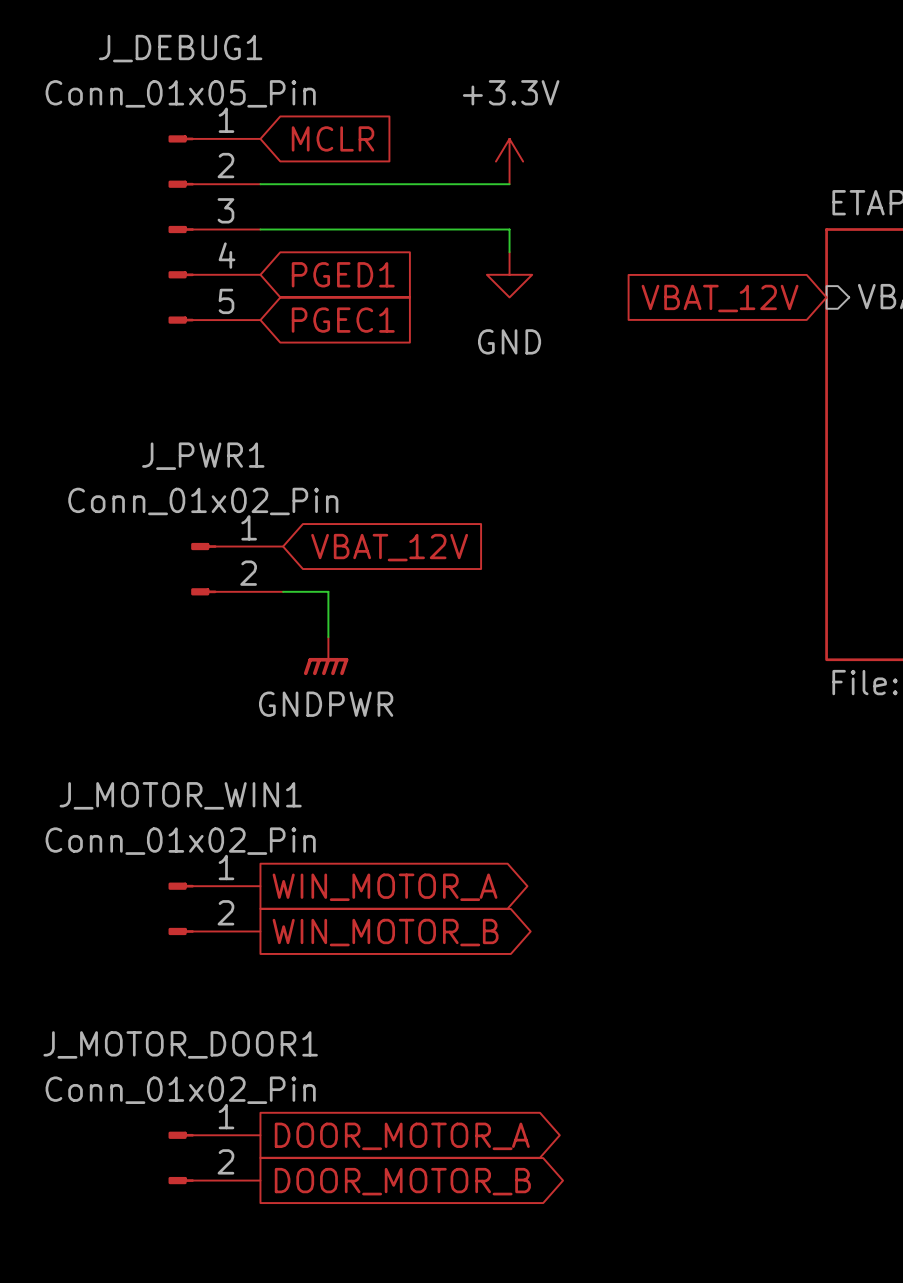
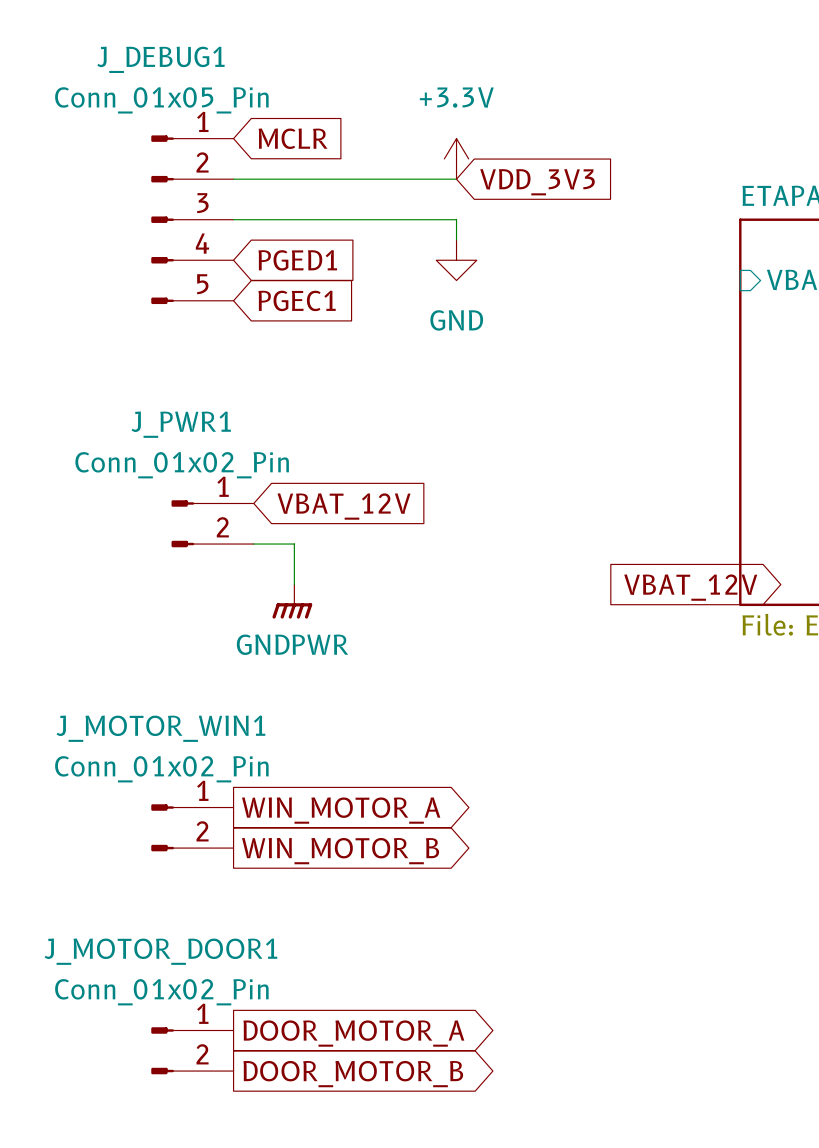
global label: none -> VDD_3V3 (537, 182)
global label position: VBAT_12V (720, 298) -> VBAT_12V (690, 587)

